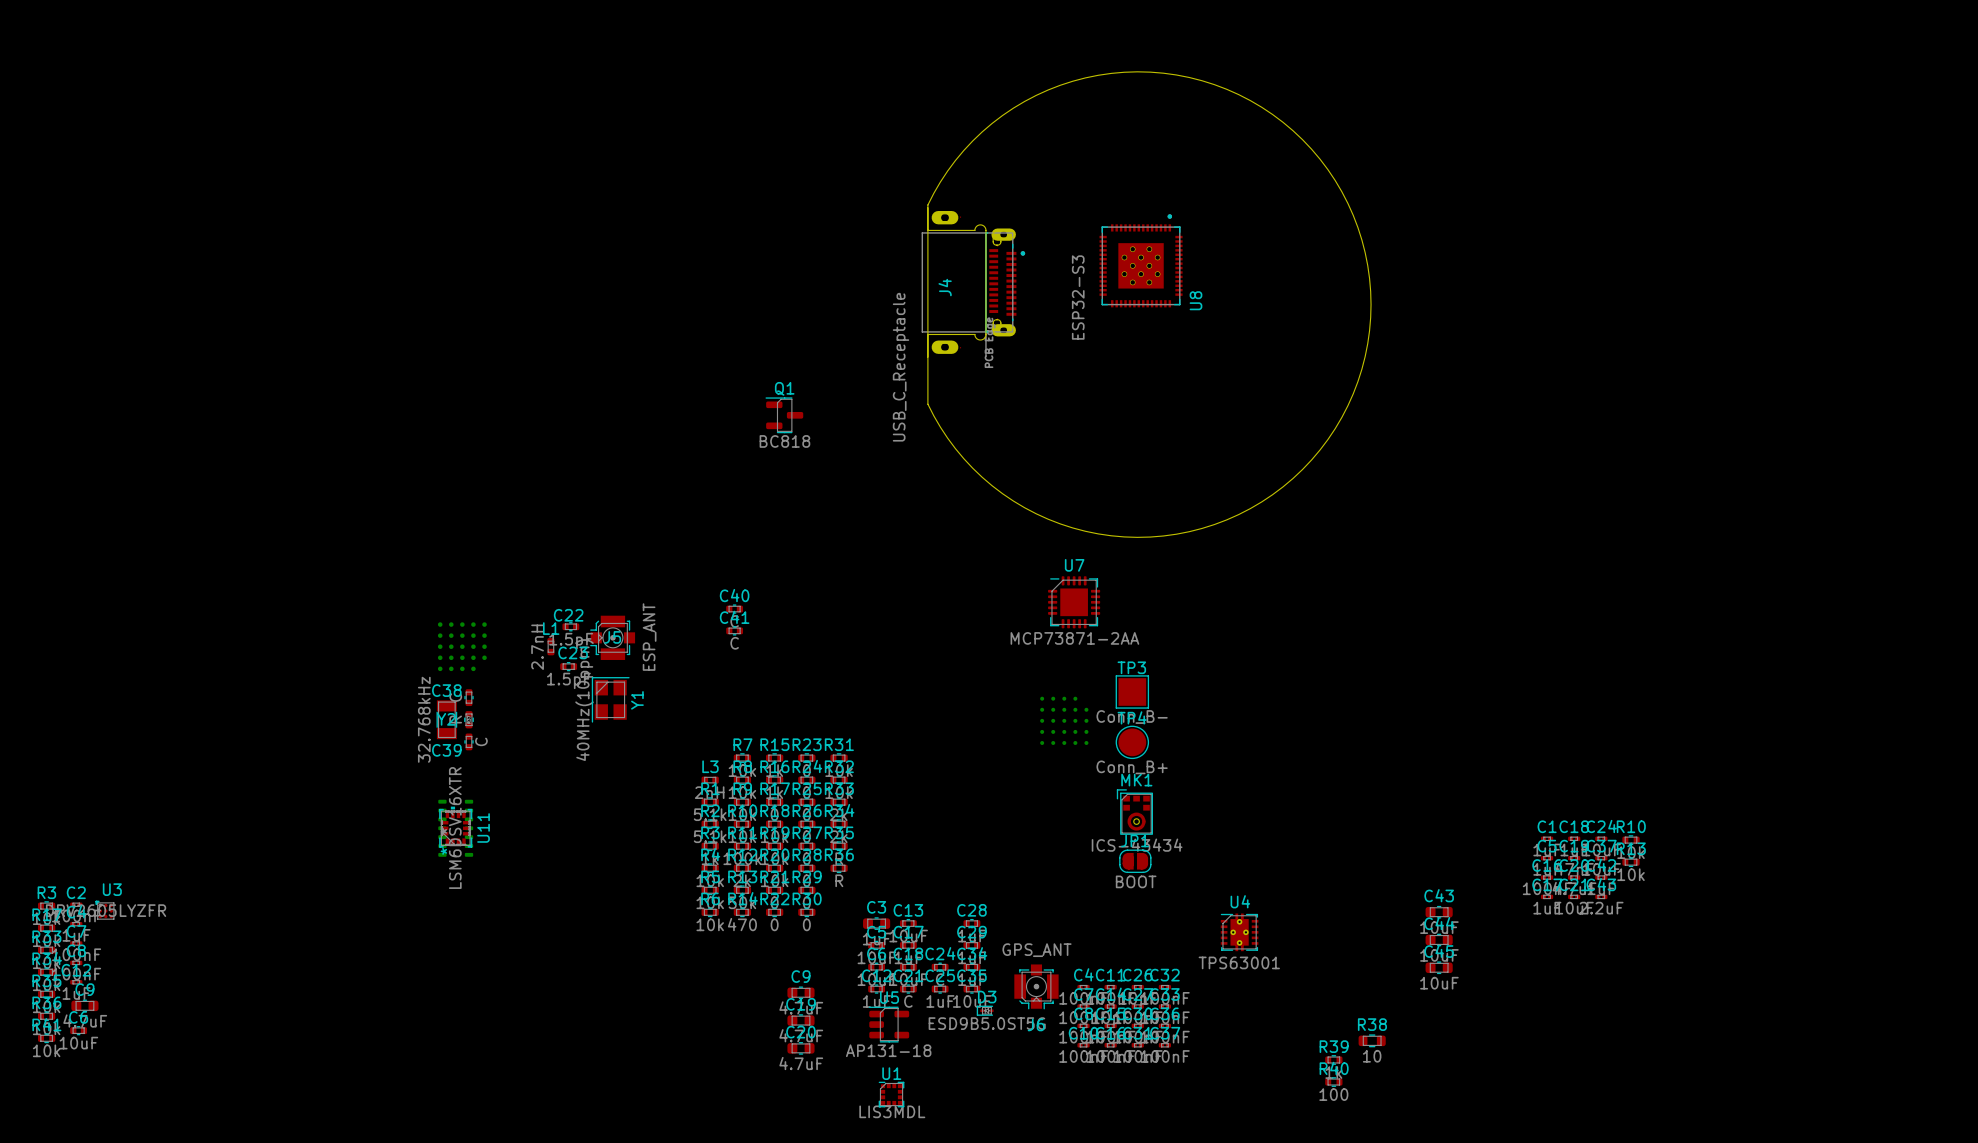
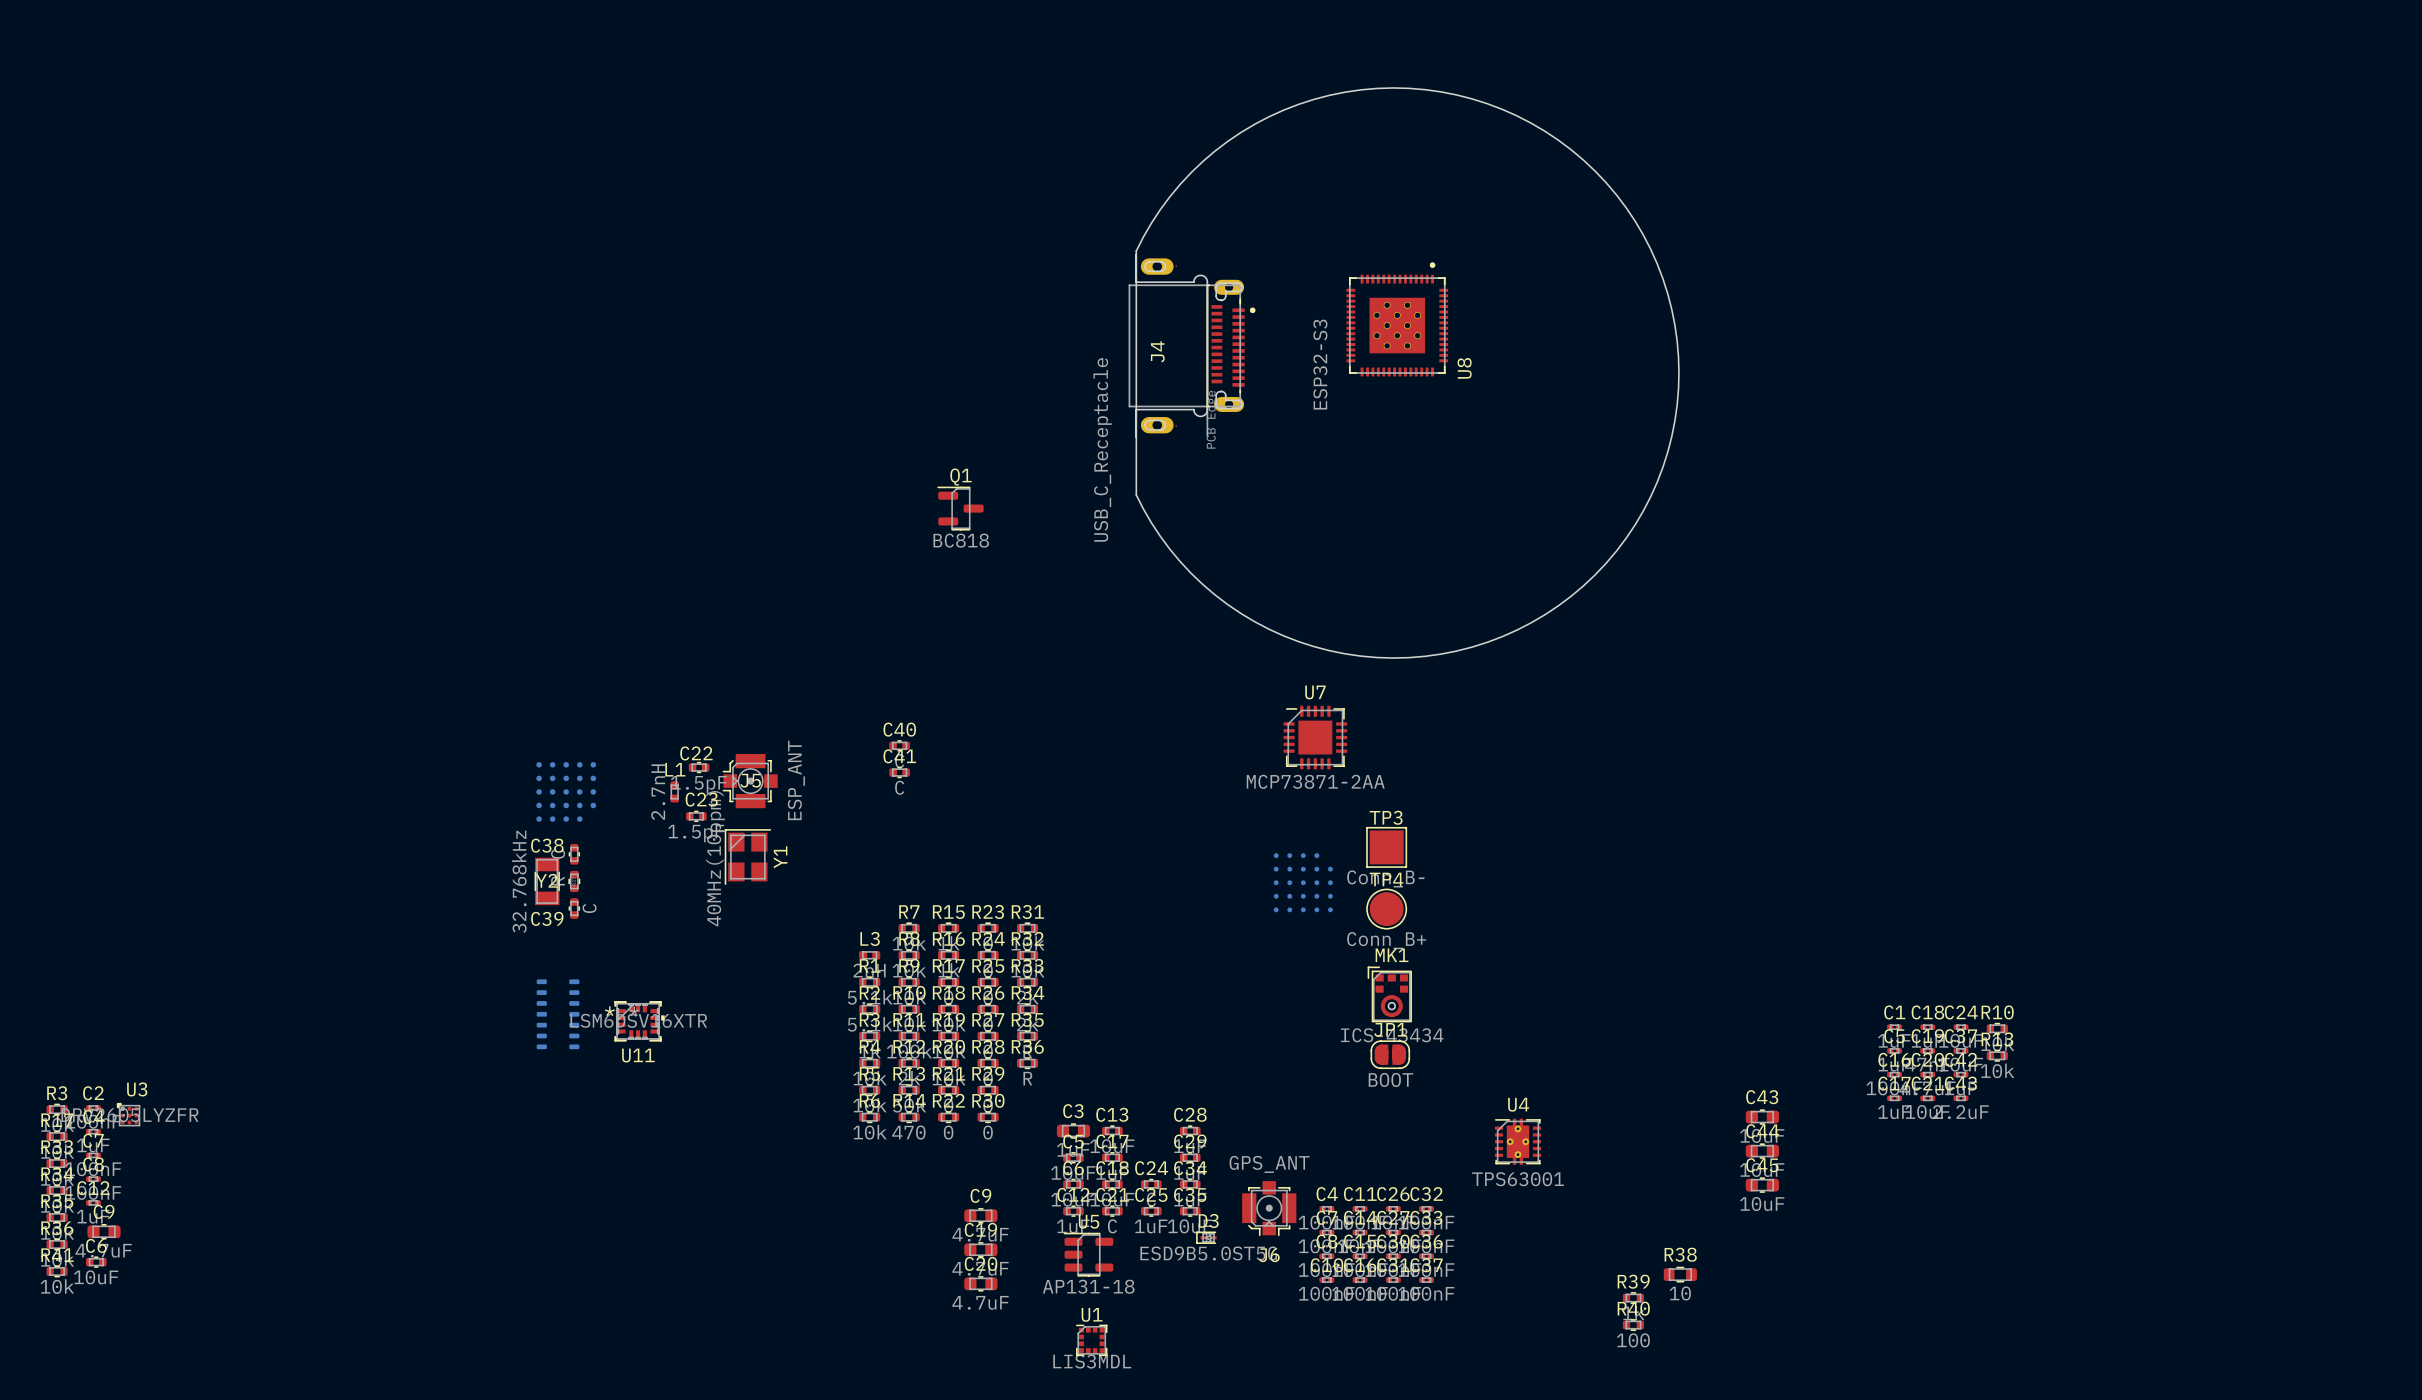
U11 rotation: 0° (455, 827) -> 90° clockwise (639, 1021)
U11 position: (455, 827) -> (639, 1021)

